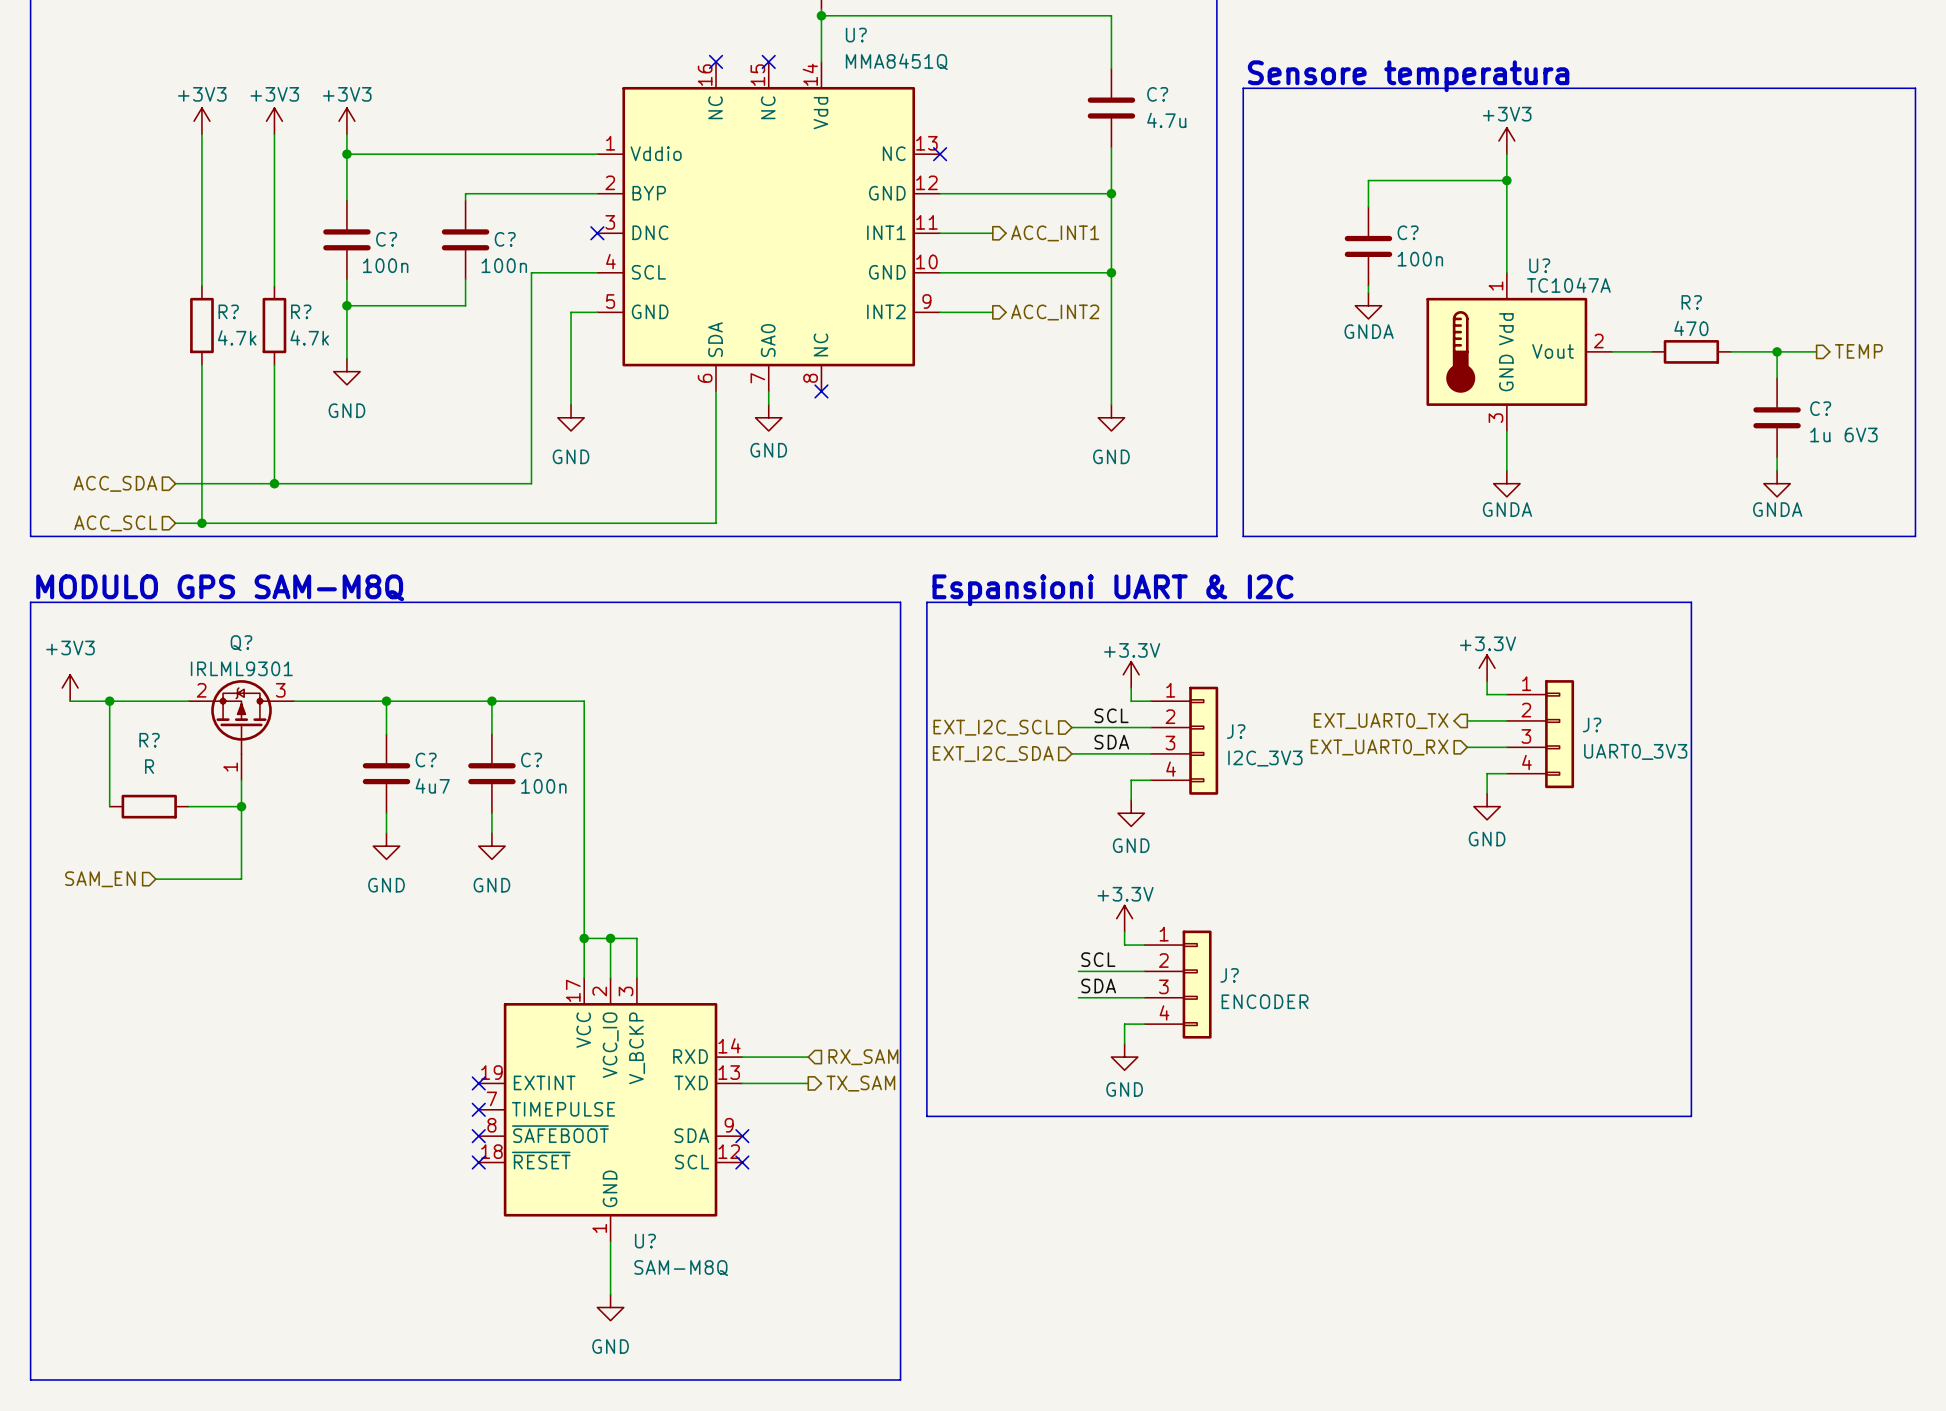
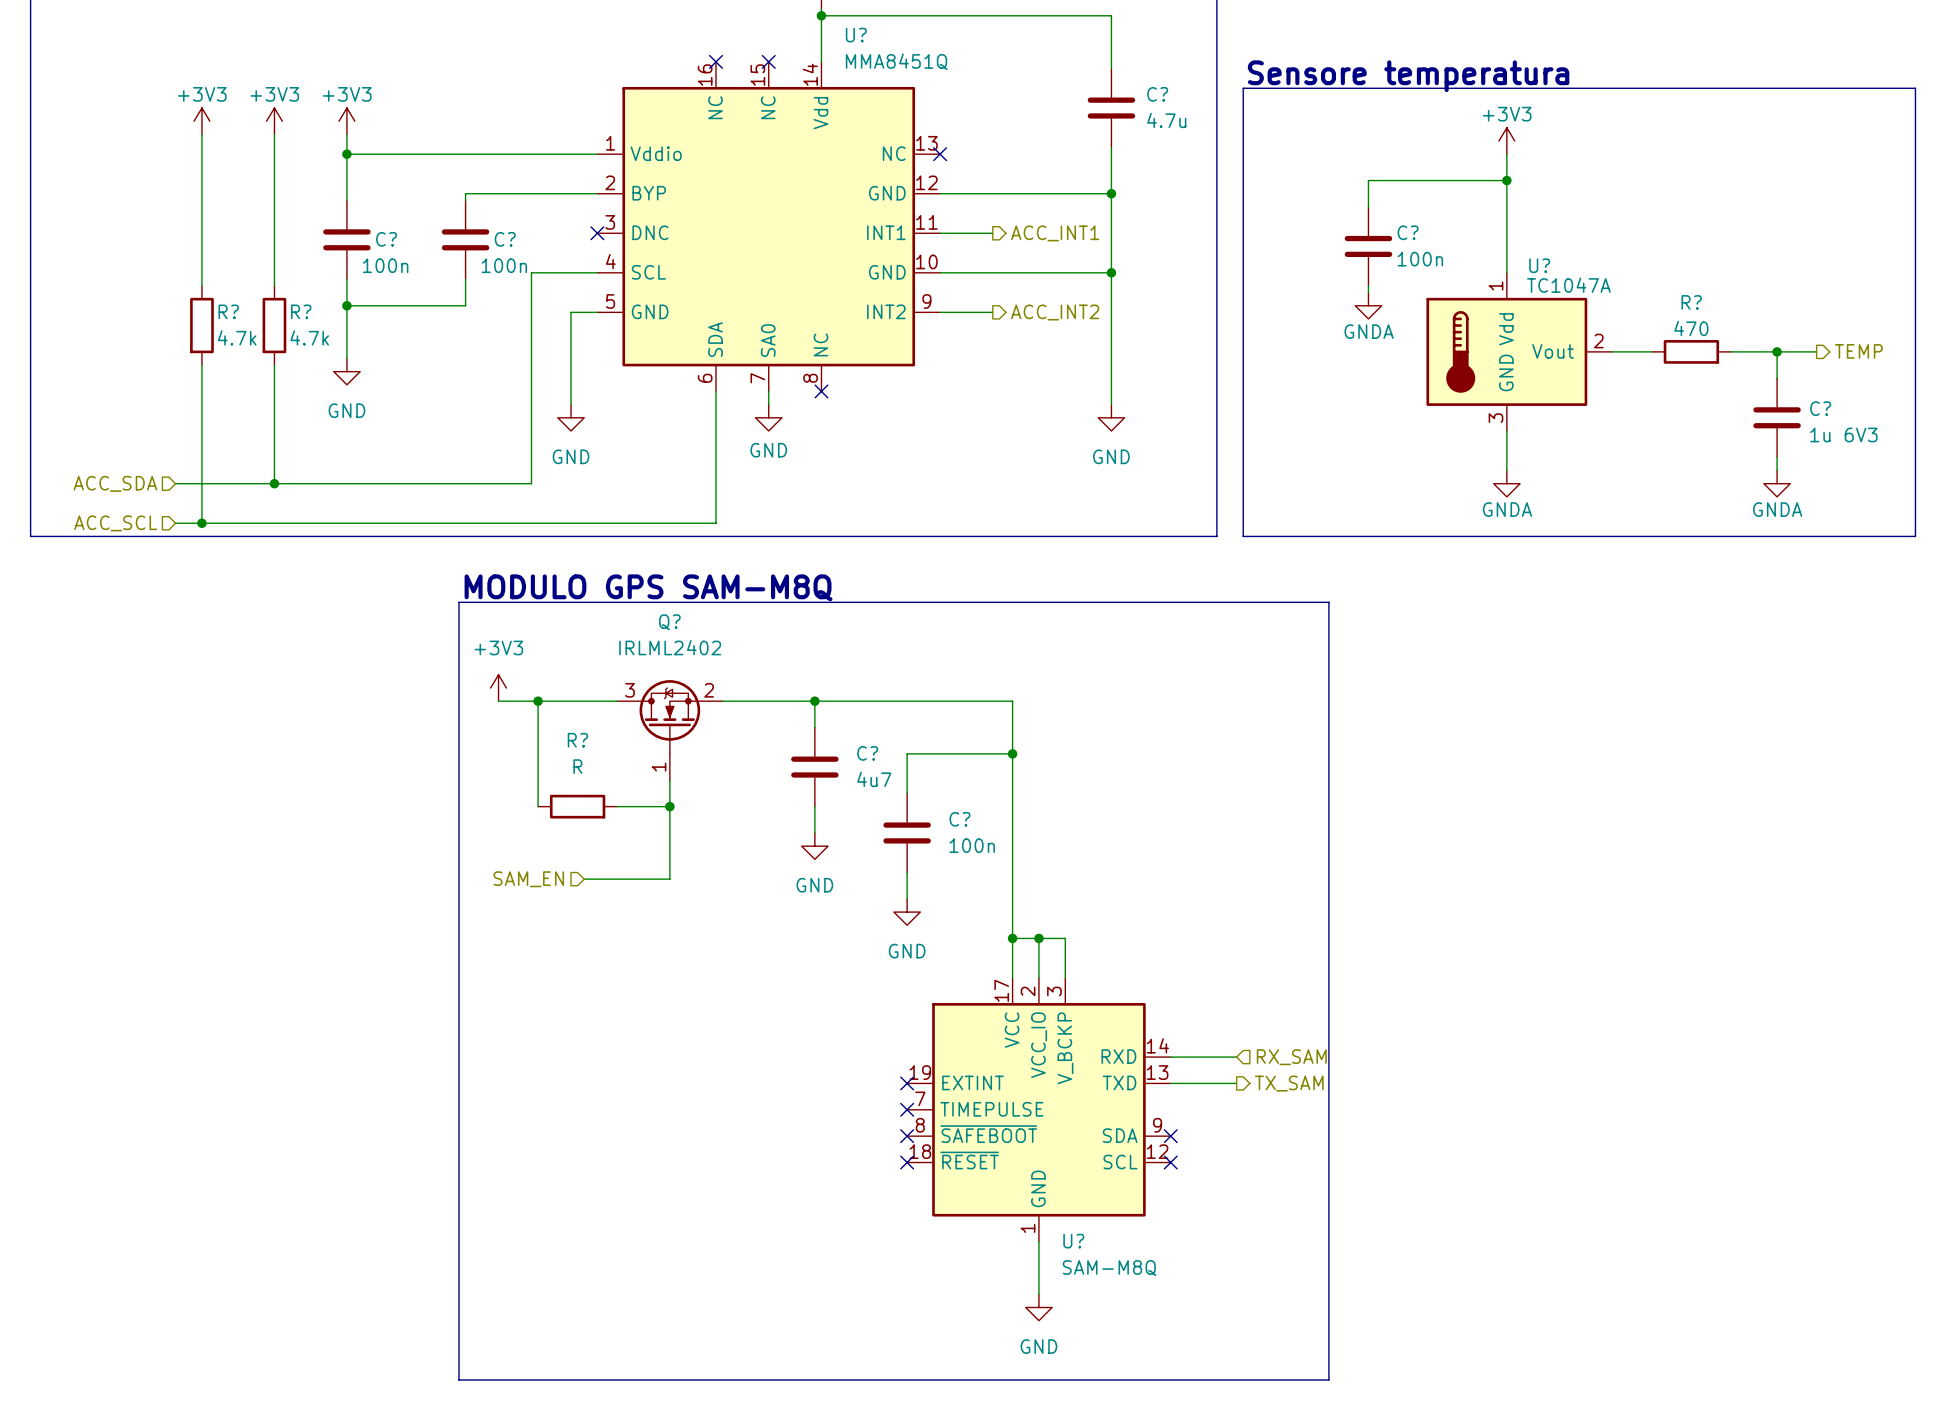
text: MODULO GPS SAM-M8Q (220, 587) -> none
text: none -> MODULO GPS SAM-M8Q (648, 587)
text: Espansioni UART & I2C (1112, 590) -> none
line: (458, 602) (30, 602) (30, 1380) (458, 1380) -> (458, 602) (458, 1380)
line: (900, 602) (900, 1380) -> (1328, 602) (1328, 1380) (900, 1380)
line: (926, 602) (926, 1116) (1691, 1116) (1691, 602) (1328, 602) -> (926, 602) (900, 602)
power symbol: +3.3V (1487, 668) -> none
power symbol: +3.3V (1131, 674) -> none
wire: (1487, 681) (1487, 694) (1506, 694) -> none
power symbol: +3V3 (70, 688) -> none
power symbol: none -> +3V3 (498, 688)
wire: (1131, 688) (1131, 701) (1150, 701) -> none
wire: (70, 701) (188, 701) -> none
wire: (109, 701) (109, 806) -> none
junction: (109, 701) -> none
wire: (294, 701) (498, 701) -> none
wire: (386, 701) (386, 734) -> none
junction: (386, 701) -> none
wire: (491, 701) (491, 734) -> none
junction position: (491, 701) -> (538, 701)
wire: none -> (538, 701) (538, 806)
wire: (584, 701) (584, 938) -> (584, 701) (617, 701)
wire: none -> (722, 701) (1012, 701) (1012, 977)
wire: none -> (814, 701) (814, 727)
junction: none -> (814, 701)
label: SCL (1111, 715) -> none
wire: (1467, 720) (1506, 720) -> none
hierarchical label: EXT_UART0_TX (1381, 721) -> none
hierarchical label: EXT_I2C_SCL (993, 727) -> none
wire: (1071, 727) (1150, 727) -> none
Q?: IRLML9301 (241, 730) -> none
Q?: none -> IRLML2402 (669, 730)
J?: UART0_3V3 (1540, 734) -> none
J?: I2C_3V3 (1184, 740) -> none
label: SDA (1111, 742) -> none
hierarchical label: EXT_UART0_RX (1379, 747) -> none
wire: (1467, 747) (1506, 747) -> none
wire: none -> (1012, 753) (907, 753) (907, 793)
junction: none -> (1012, 753)
wire: (1071, 753) (1150, 753) -> none
hierarchical label: EXT_I2C_SDA (993, 754) -> none
C?: none -> 4u7 (814, 767)
C?: 4u7 (386, 773) -> none
C?: 100n (491, 773) -> none
wire: (1506, 773) (1487, 773) (1487, 793) -> none
wire: (241, 780) (241, 879) (155, 879) -> none
wire: none -> (669, 780) (669, 879) (584, 879)
wire: (1150, 780) (1131, 780) (1131, 800) -> none
R?: R (149, 806) -> none
wire: (188, 806) (241, 806) -> none
junction: (241, 806) -> none
R?: none -> R (577, 806)
wire: none -> (617, 806) (669, 806)
junction: none -> (669, 806)
wire: none -> (814, 806) (814, 832)
power symbol: GND (1487, 806) -> none
wire: (386, 813) (386, 832) -> none
wire: (491, 813) (491, 832) -> none
power symbol: GND (1131, 813) -> none
C?: none -> 100n (907, 832)
power symbol: GND (386, 846) -> none
power symbol: GND (491, 846) -> none
power symbol: none -> GND (814, 846)
wire: none -> (907, 872) (907, 898)
hierarchical label: SAM_EN (100, 879) -> none
hierarchical label: none -> SAM_EN (528, 879)
power symbol: none -> GND (907, 912)
power symbol: +3.3V (1124, 918) -> none
wire: (1124, 931) (1124, 945) (1144, 945) -> none
wire: (584, 938) (636, 938) (636, 977) -> none
wire: (584, 938) (584, 977) -> none
junction: (584, 938) -> none
wire: (610, 938) (610, 977) -> none
junction: (610, 938) -> none
wire: none -> (1012, 938) (1065, 938) (1065, 977)
junction: none -> (1012, 938)
wire: none -> (1038, 938) (1038, 977)
junction: none -> (1038, 938)
label: SCL (1098, 959) -> none
wire: (1078, 971) (1144, 971) -> (1170, 1057) (1236, 1057)
J?: ENCODER (1178, 984) -> none
label: SDA (1098, 985) -> none
wire: (1078, 997) (1144, 997) -> (1170, 1083) (1236, 1083)
wire: (742, 1057) (808, 1057) -> none
hierarchical label: RX_SAM (863, 1057) -> none
power symbol: GND (1124, 1057) -> none
hierarchical label: none -> RX_SAM (1291, 1057)
no-connect mark: (478, 1083) -> none
wire: (742, 1083) (808, 1083) -> none
hierarchical label: TX_SAM (860, 1083) -> none
no-connect mark: none -> (907, 1083)
hierarchical label: none -> TX_SAM (1289, 1083)
no-connect mark: (478, 1109) -> none
U?: SAM-M8Q (610, 1109) -> none
no-connect mark: none -> (907, 1109)
U?: none -> SAM-M8Q (1038, 1109)
no-connect mark: (478, 1136) -> none
no-connect mark: (742, 1136) -> none
no-connect mark: none -> (907, 1136)
no-connect mark: none -> (1170, 1136)
no-connect mark: (478, 1162) -> none
no-connect mark: (742, 1162) -> none
no-connect mark: none -> (907, 1162)
no-connect mark: none -> (1170, 1162)
wire: (610, 1241) (610, 1294) -> none
wire: none -> (1038, 1241) (1038, 1294)
power symbol: GND (610, 1307) -> none
power symbol: none -> GND (1038, 1307)

